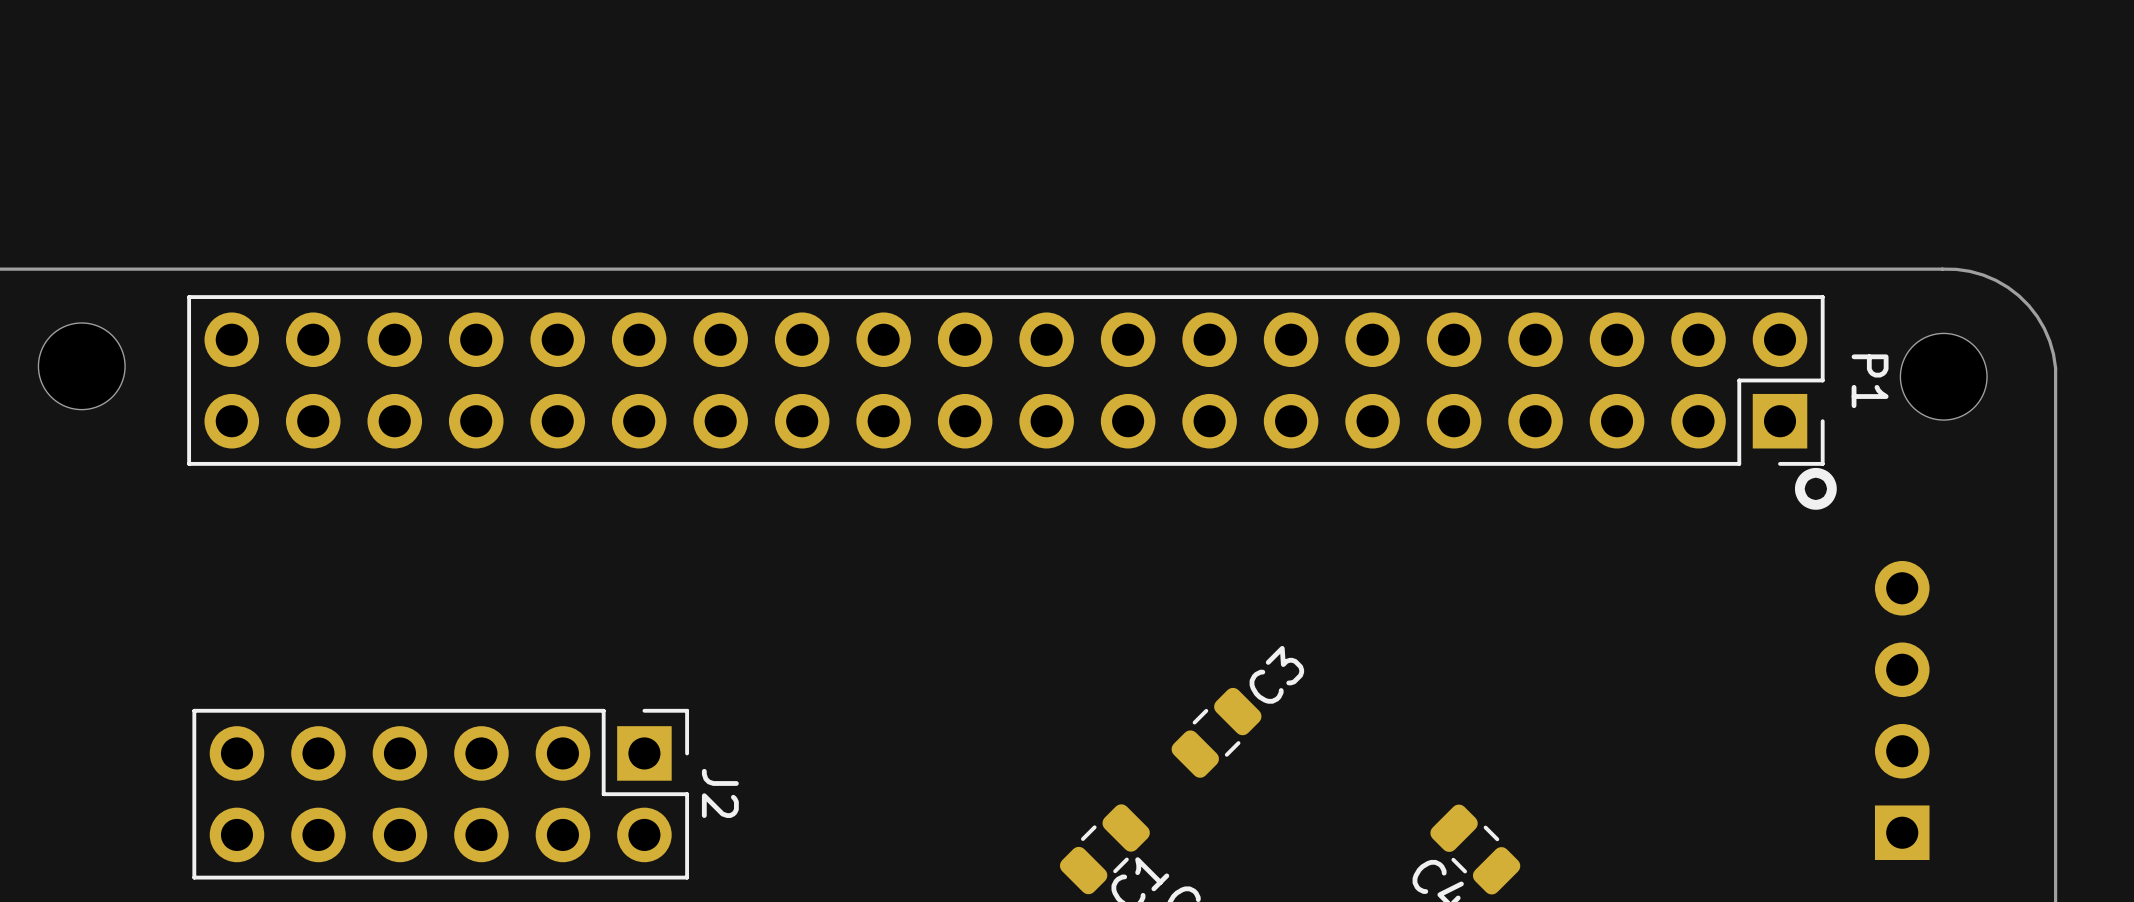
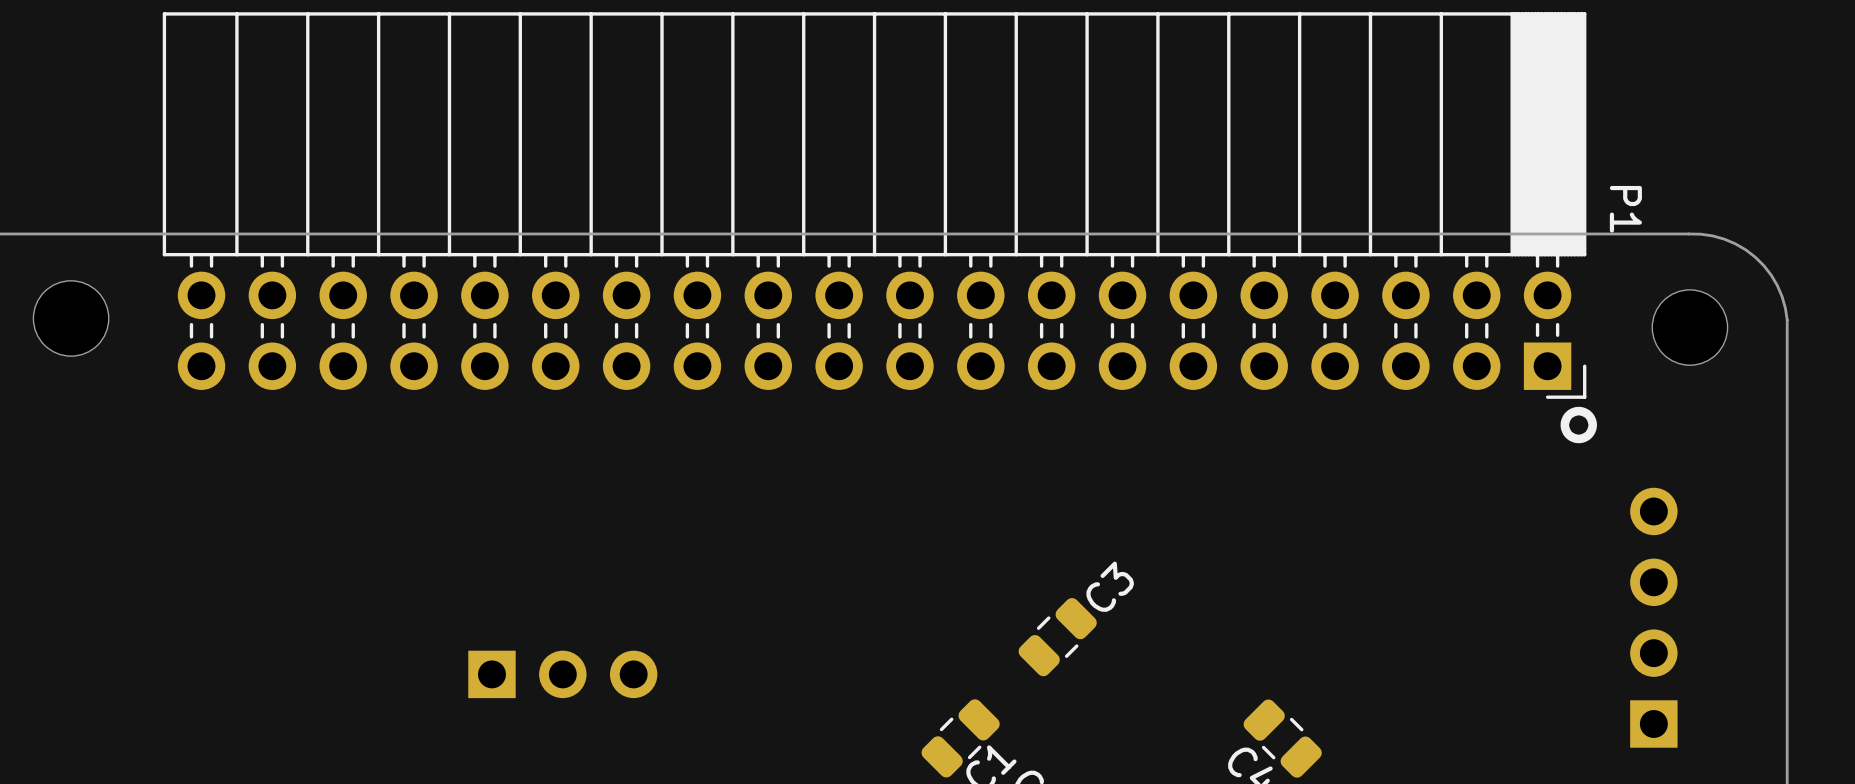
P1 footprint: [187, 295, 1825, 466] -> [162, 12, 1587, 399]
part: none -> (562, 674)
J2: (440, 794) -> none

